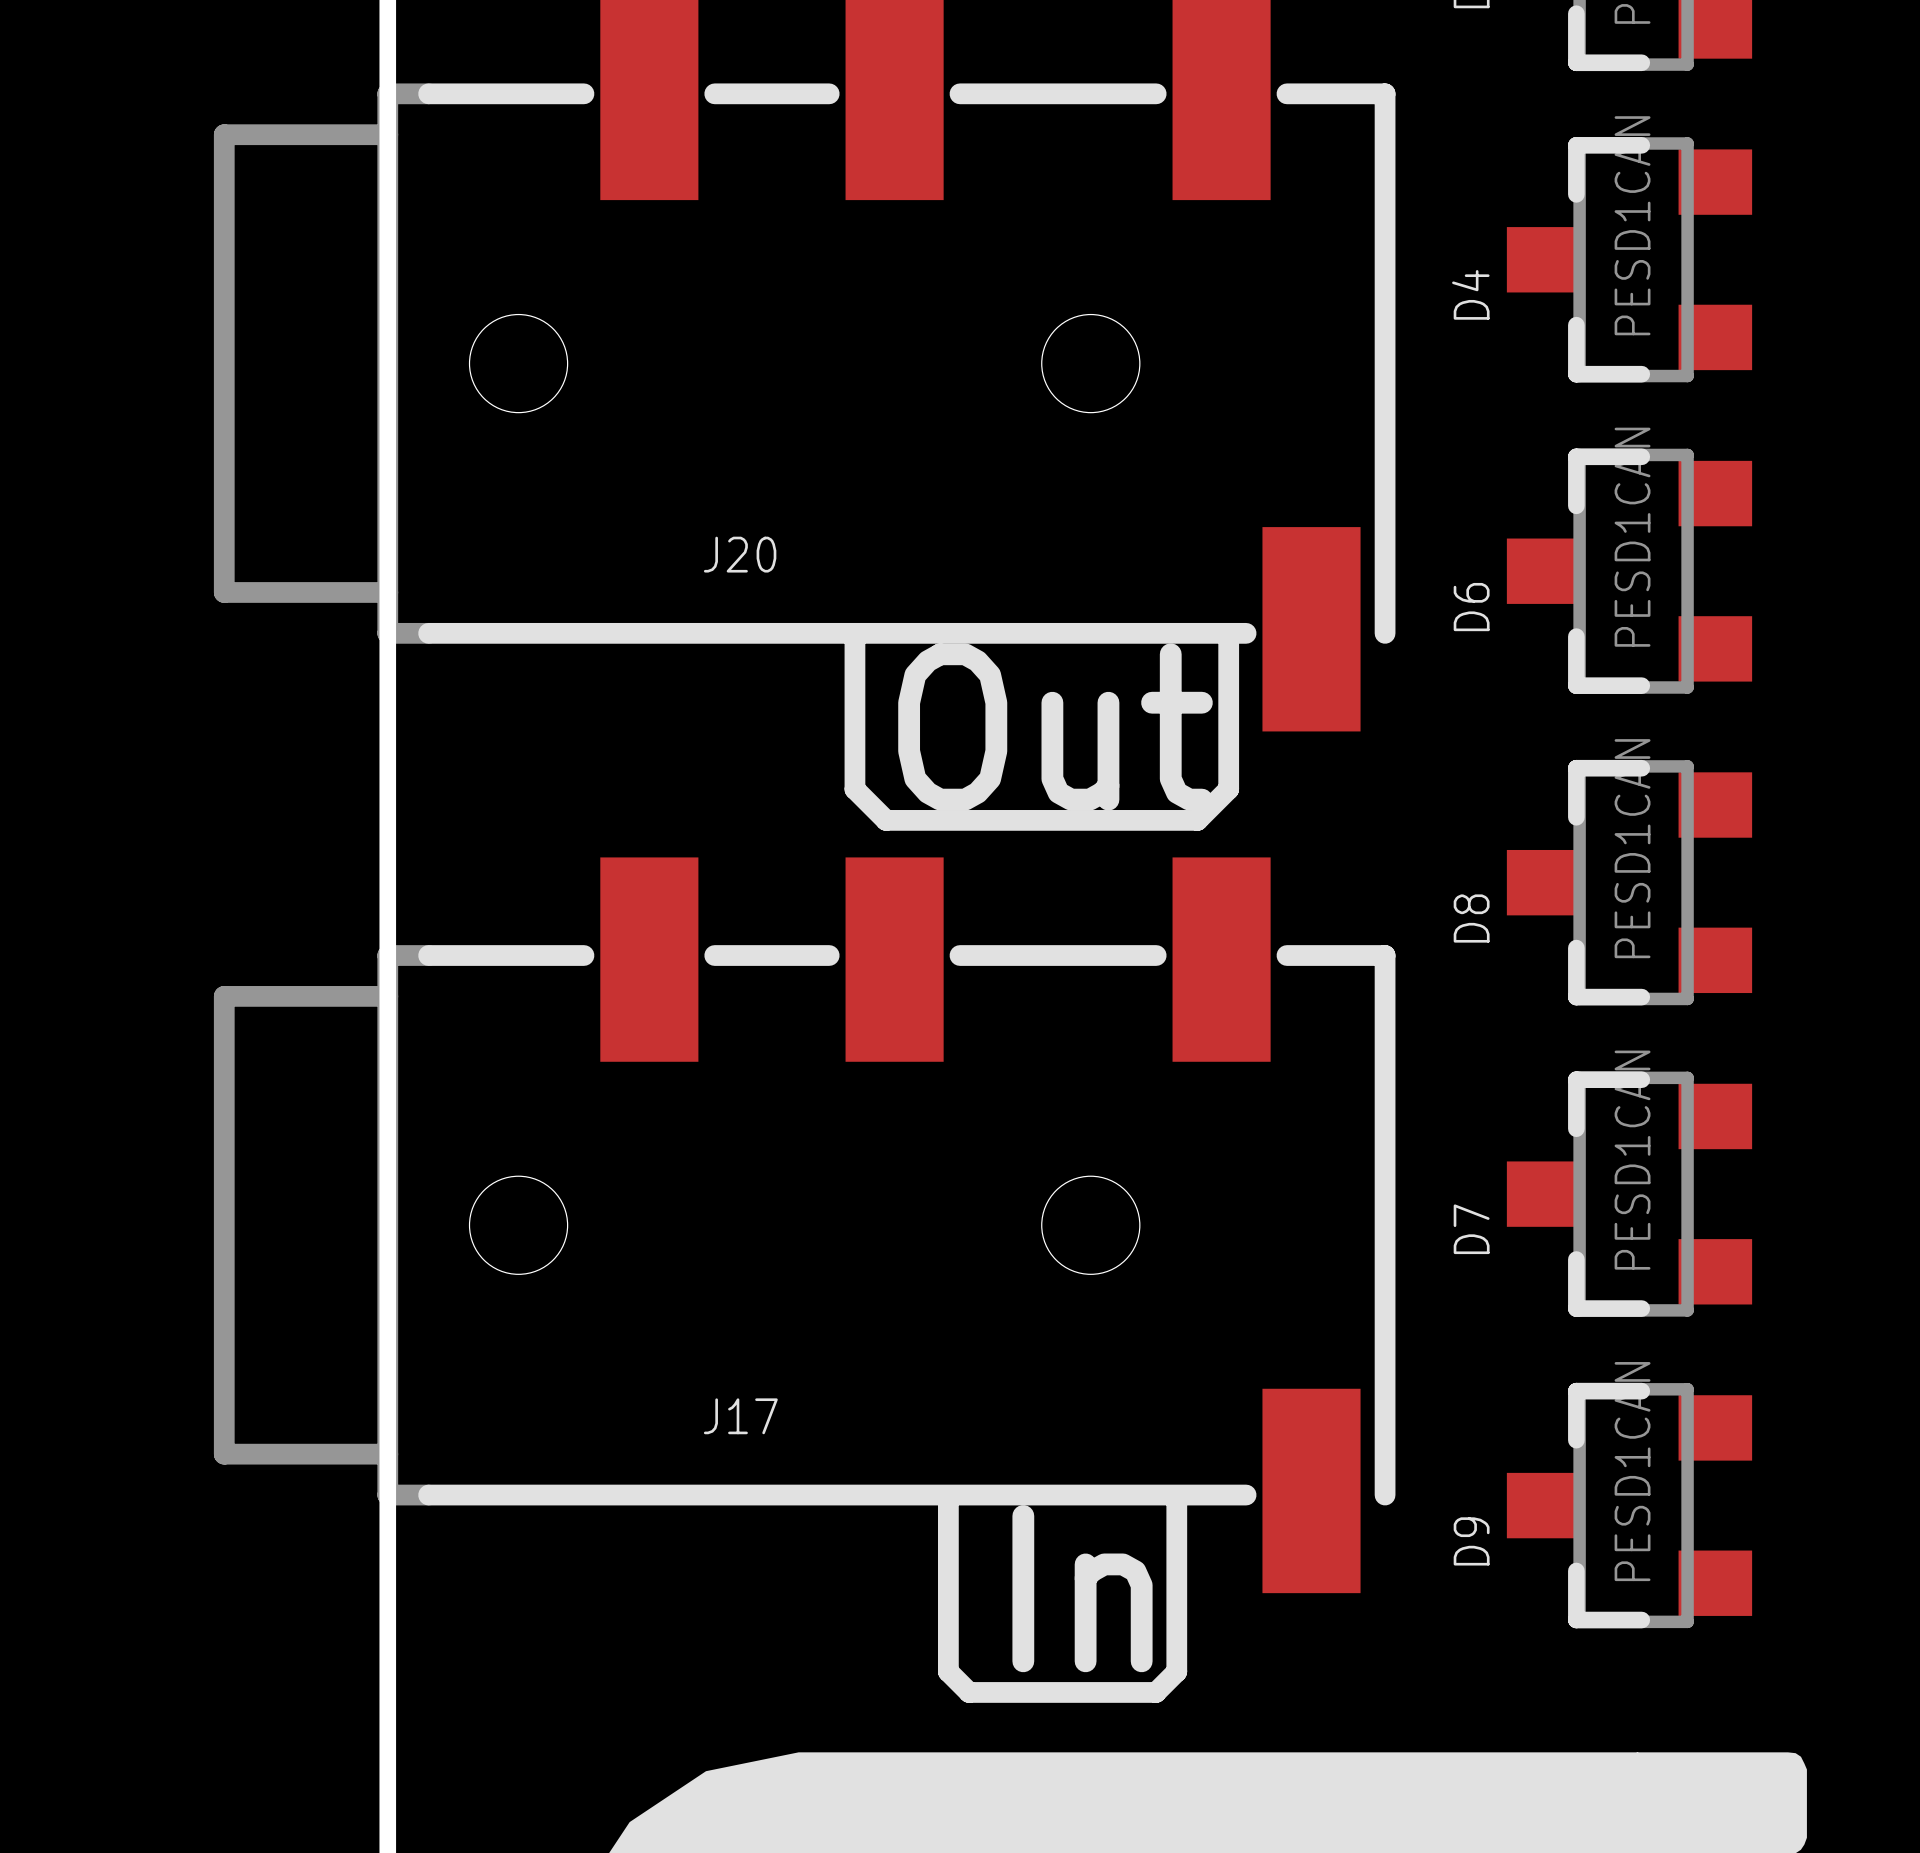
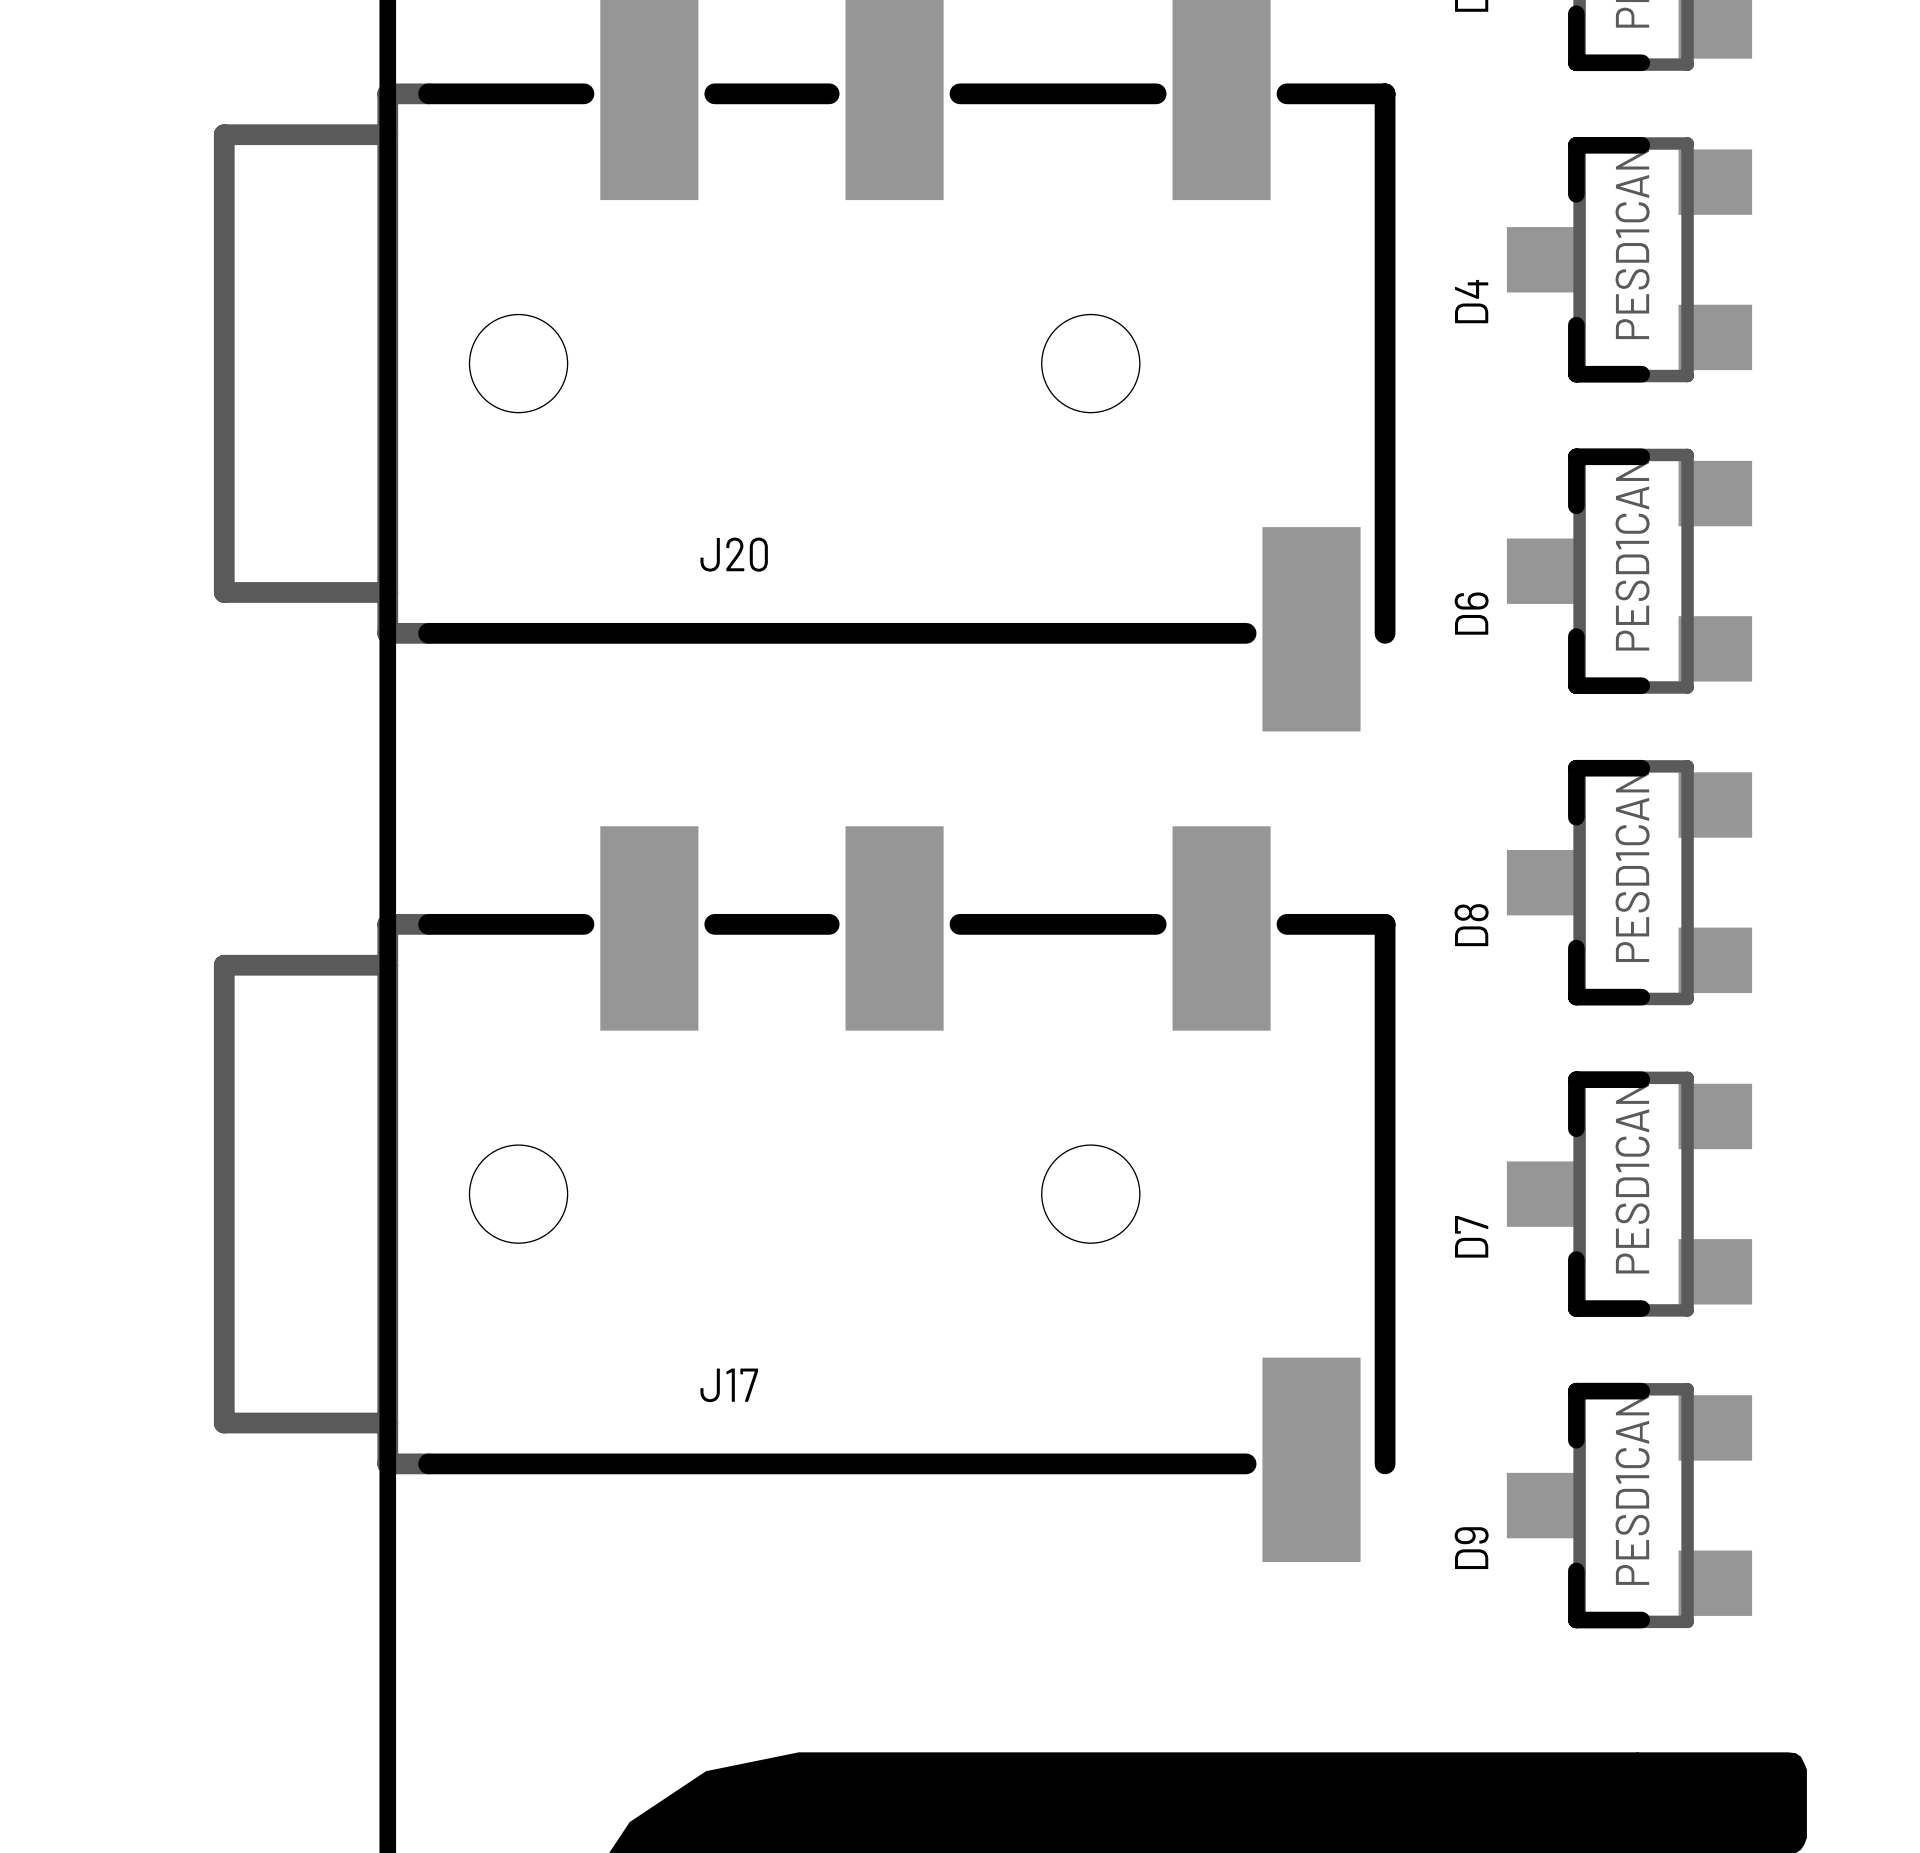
line: (854, 643) (854, 789) (886, 820) (1197, 820) (1228, 789) (1228, 643) -> none
text: Out (1055, 726) -> none
J17 position: (804, 1225) -> (804, 1194)
line: (948, 1505) (948, 1671) (969, 1692) (1156, 1692) (1176, 1671) (1176, 1505) -> none
text: In (1082, 1588) -> none

